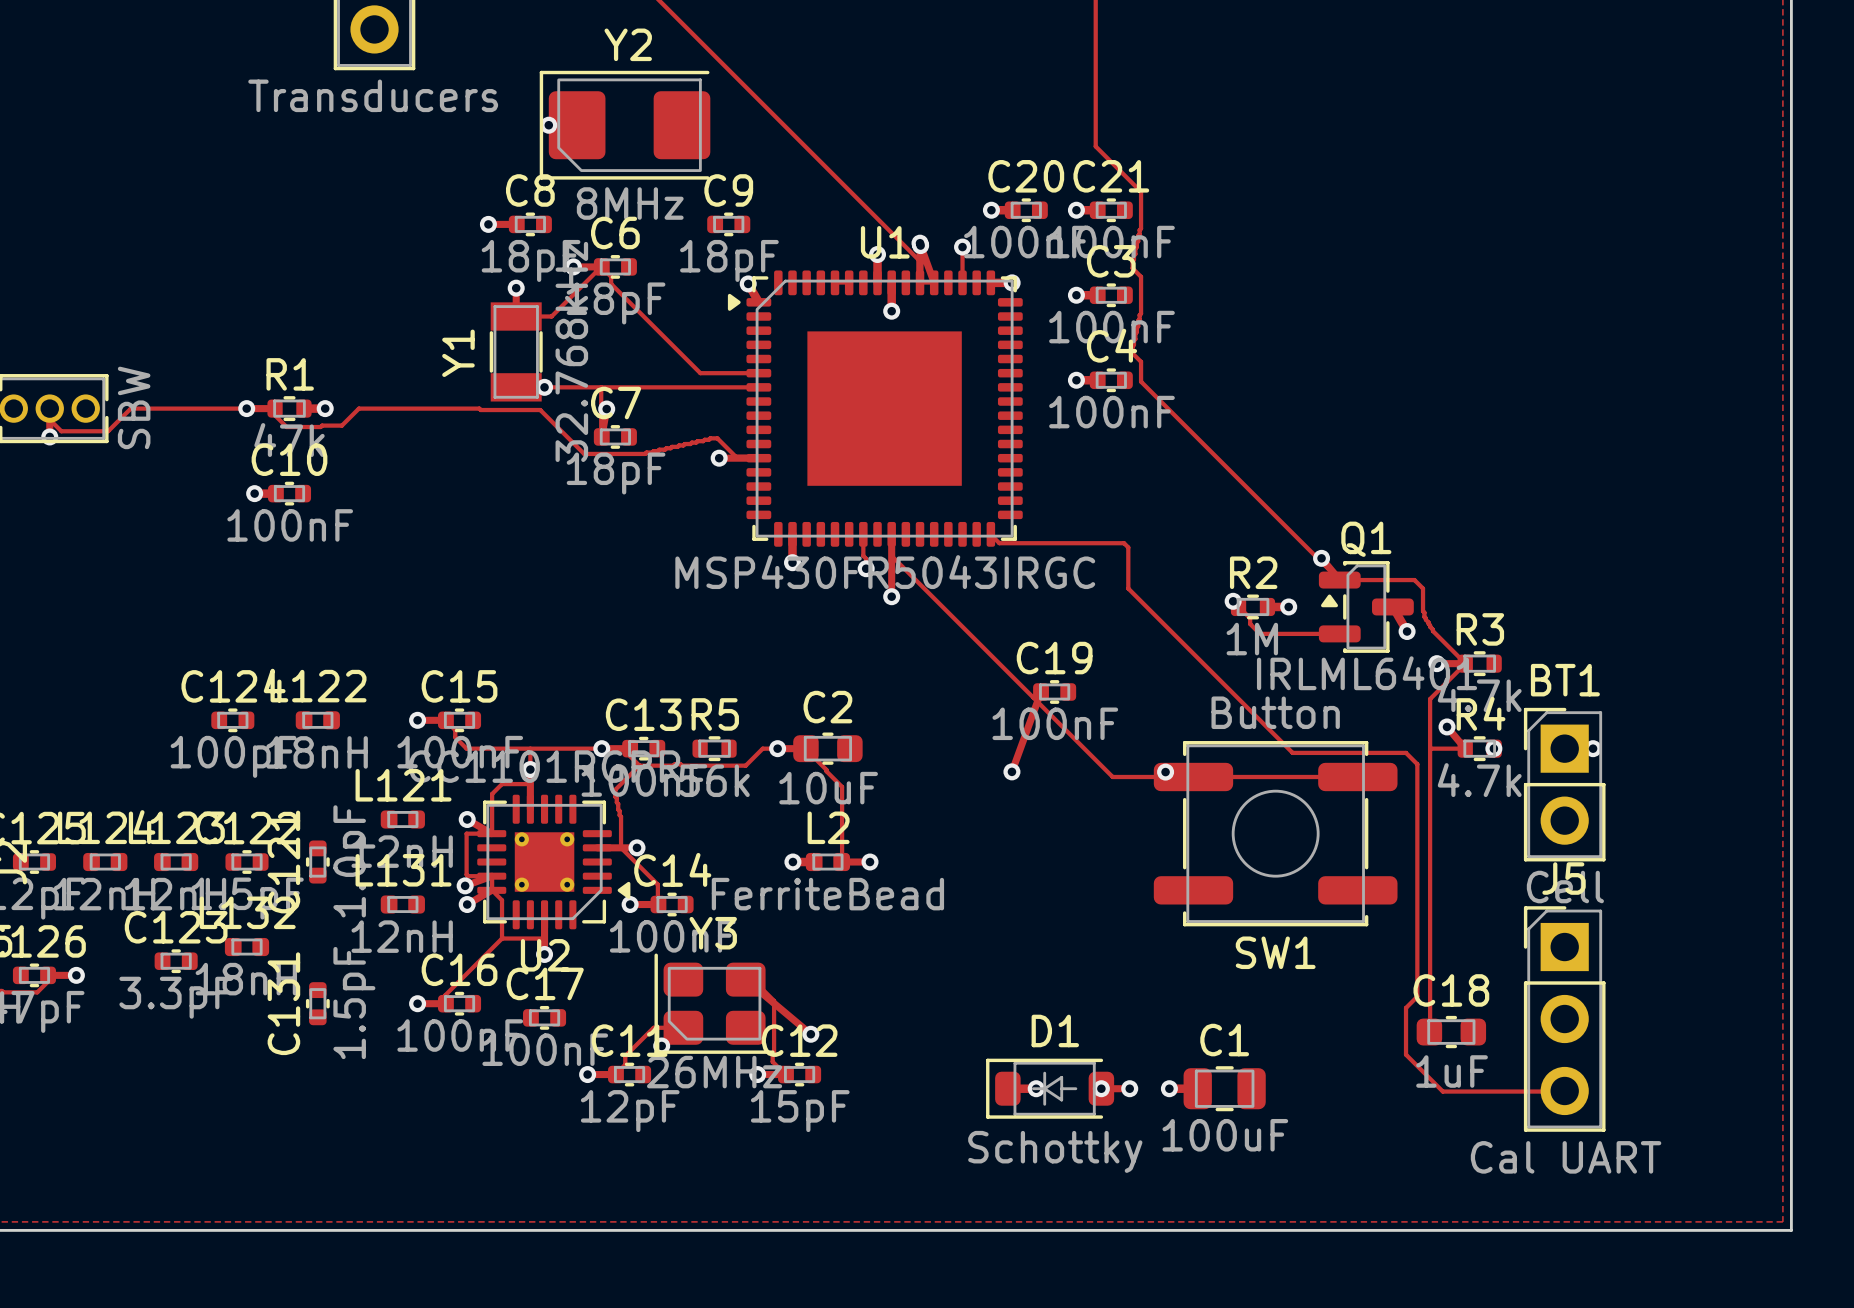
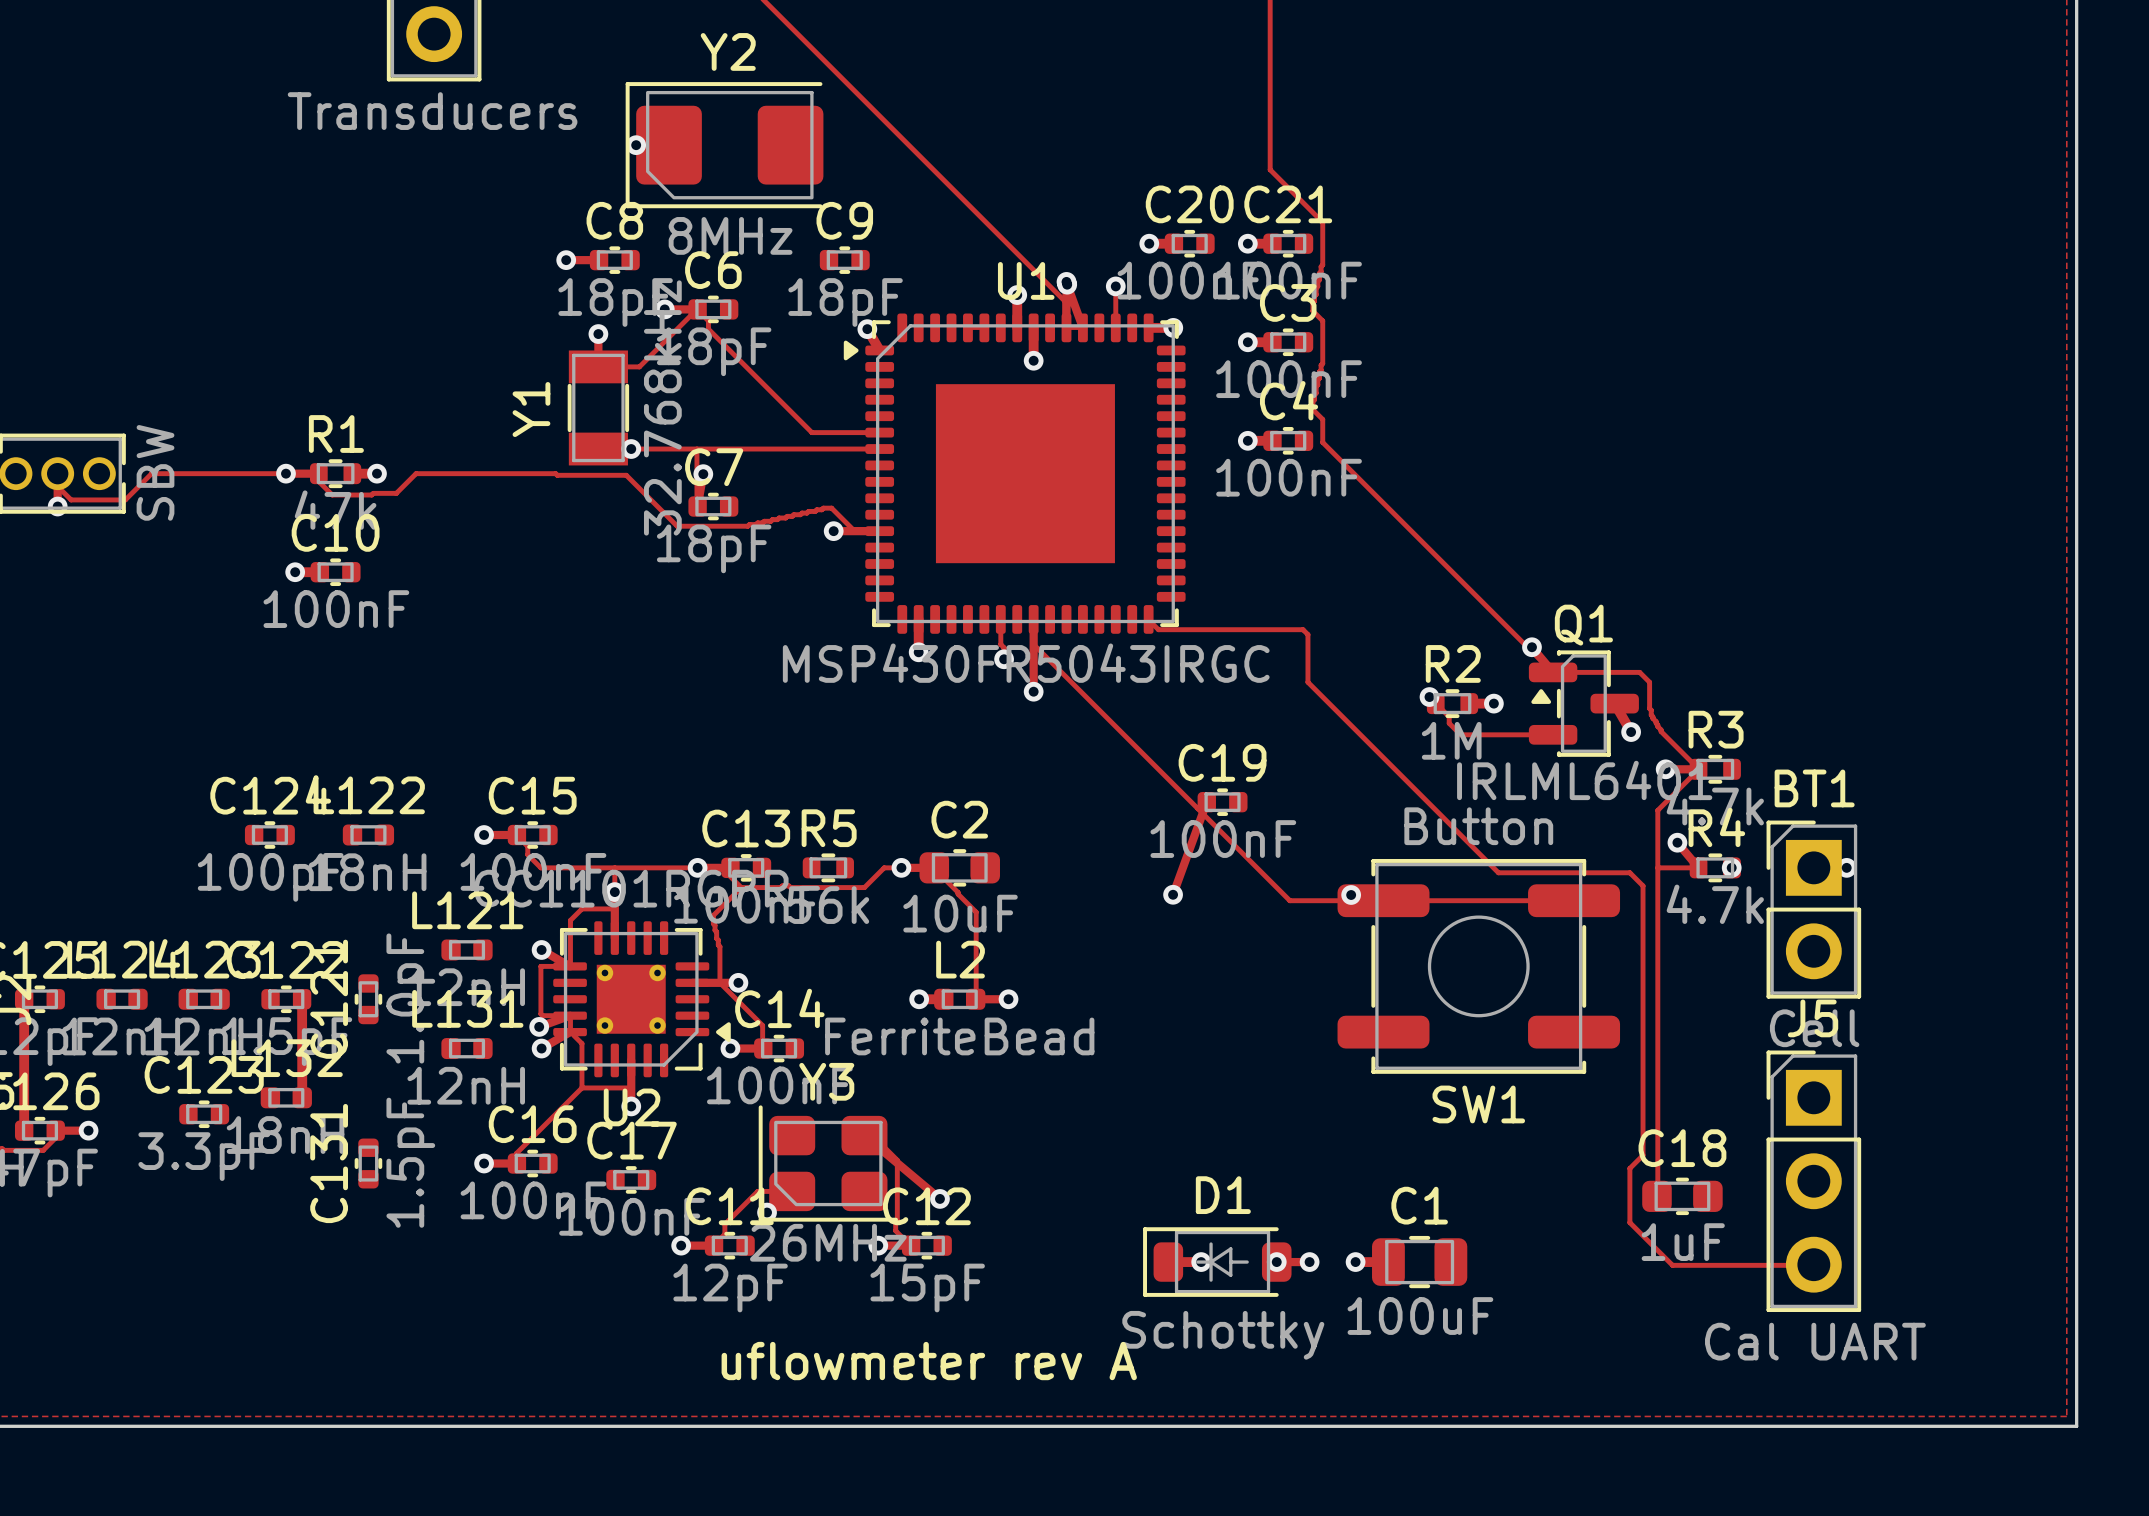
track: none -> (24, 999) (24, 1130)
track: none -> (302, 999) (302, 1097)
text: none -> uflowmeter rev A (929, 1361)

